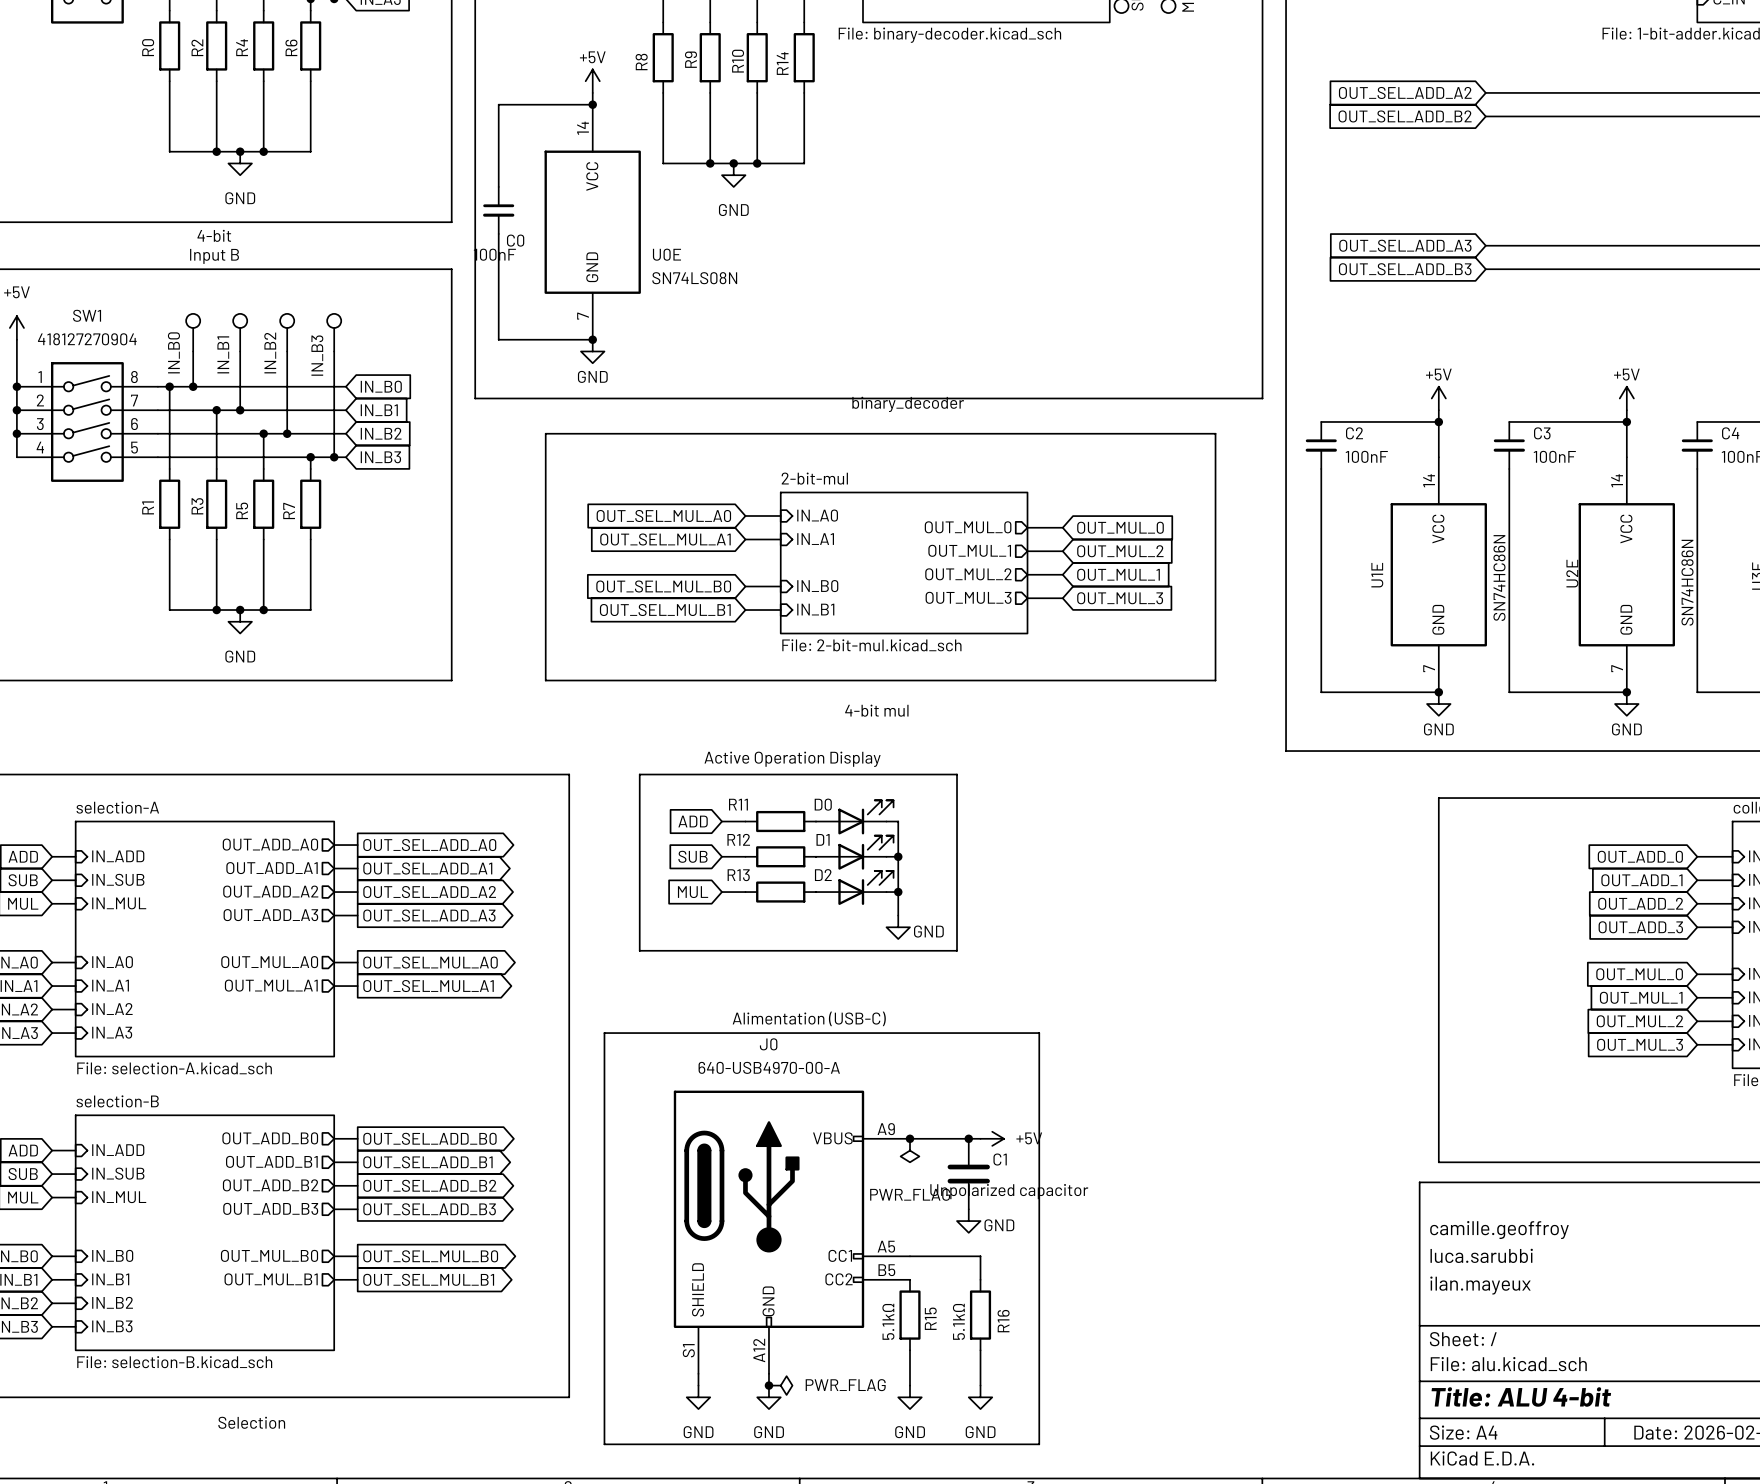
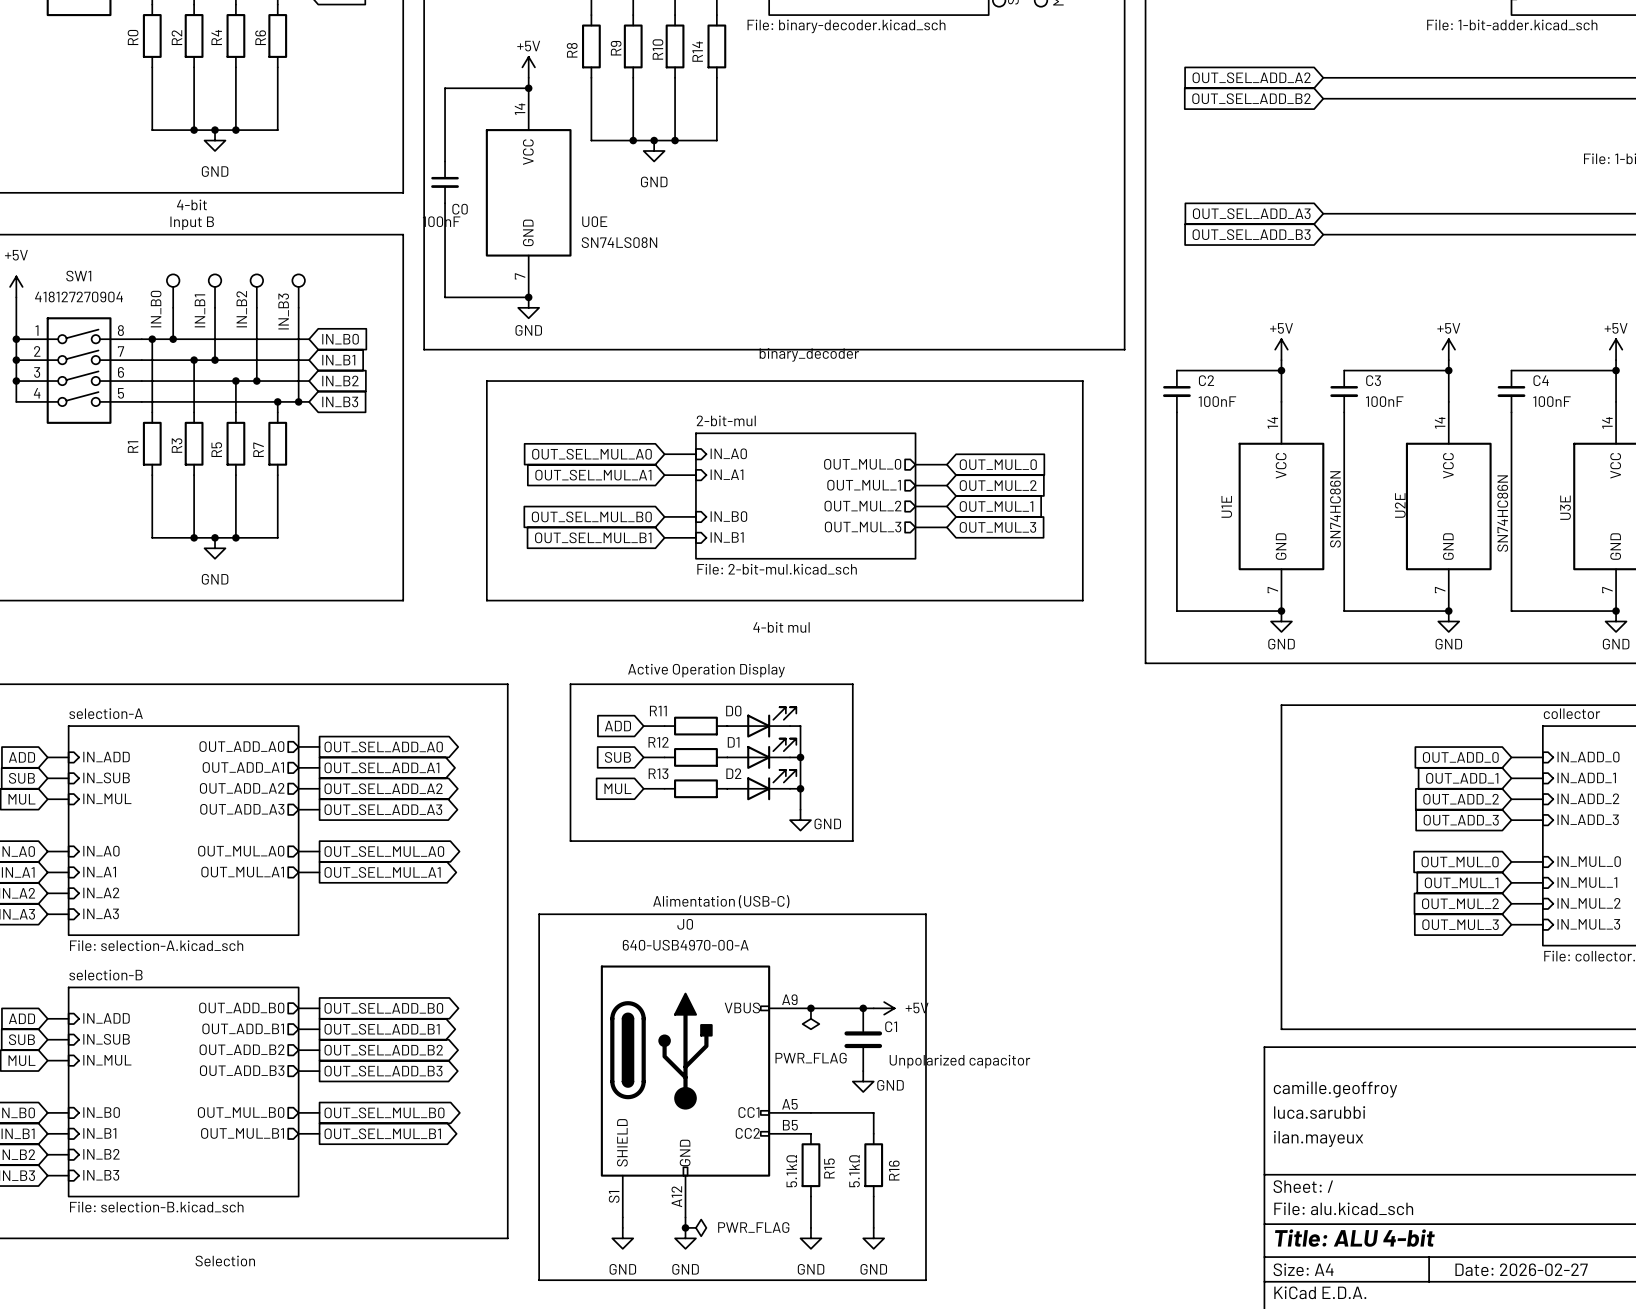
C1 text position: Unpolarized capacitor (1009, 1191) -> Unpolarized capacitor (959, 1061)

